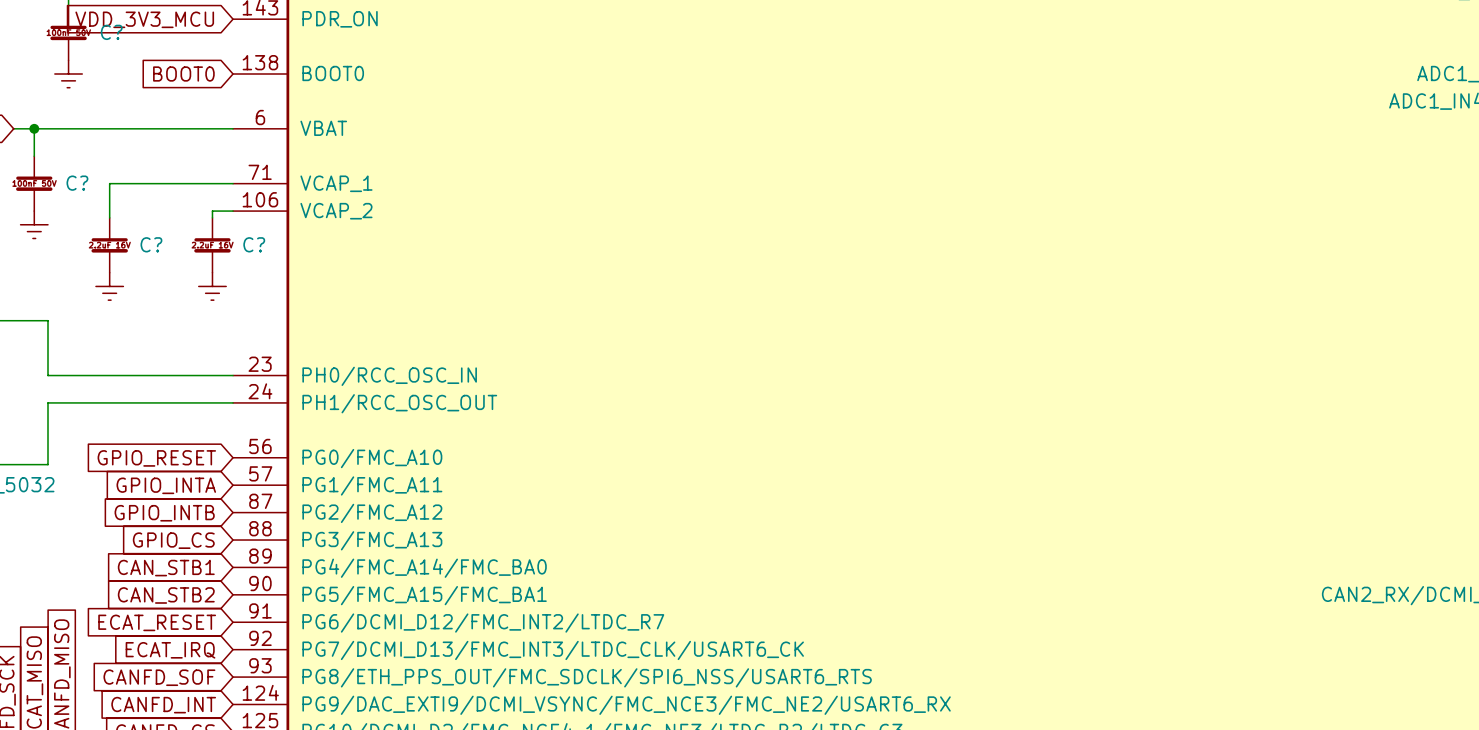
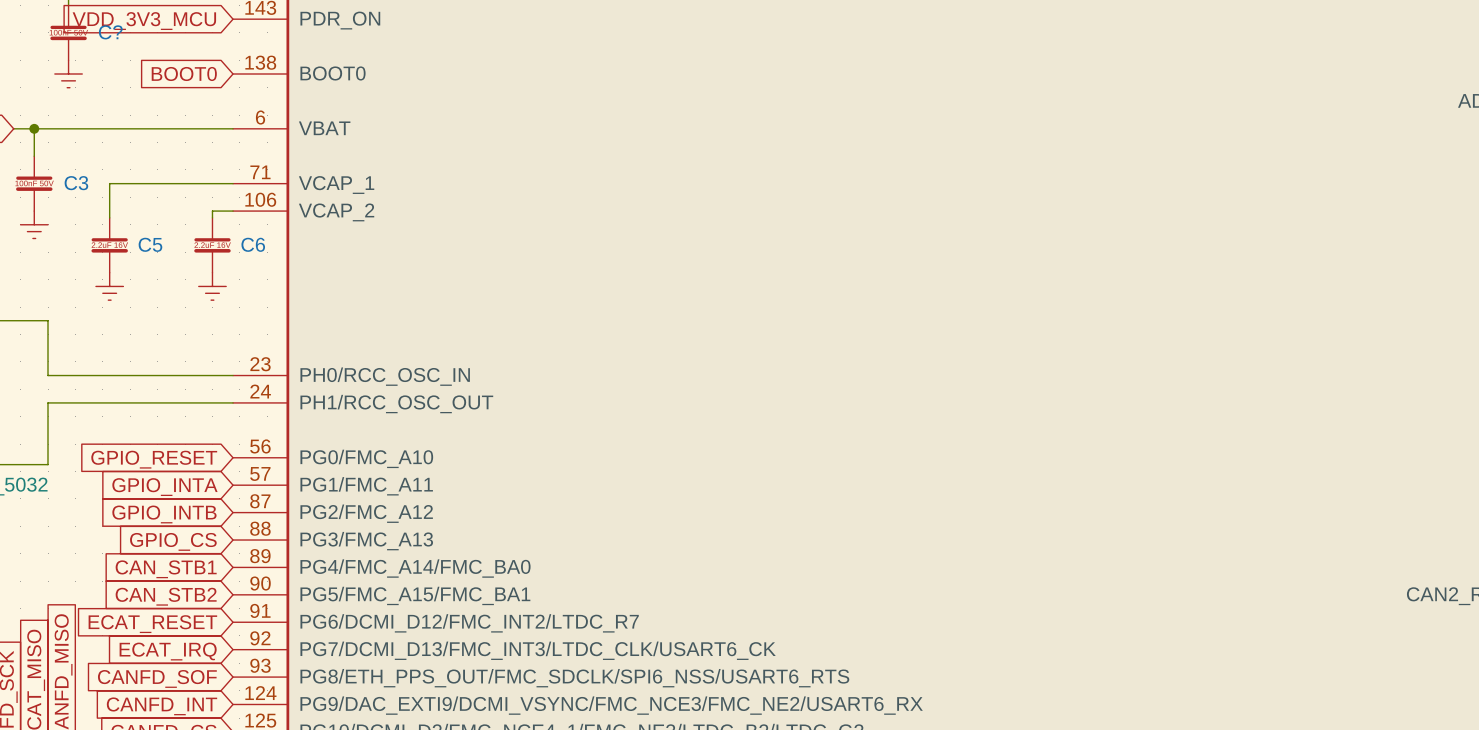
C? name: C? (77, 183) -> C3 (76, 183)
C? name: C? (151, 244) -> C5 (150, 244)
C? name: C? (254, 244) -> C6 (253, 244)

